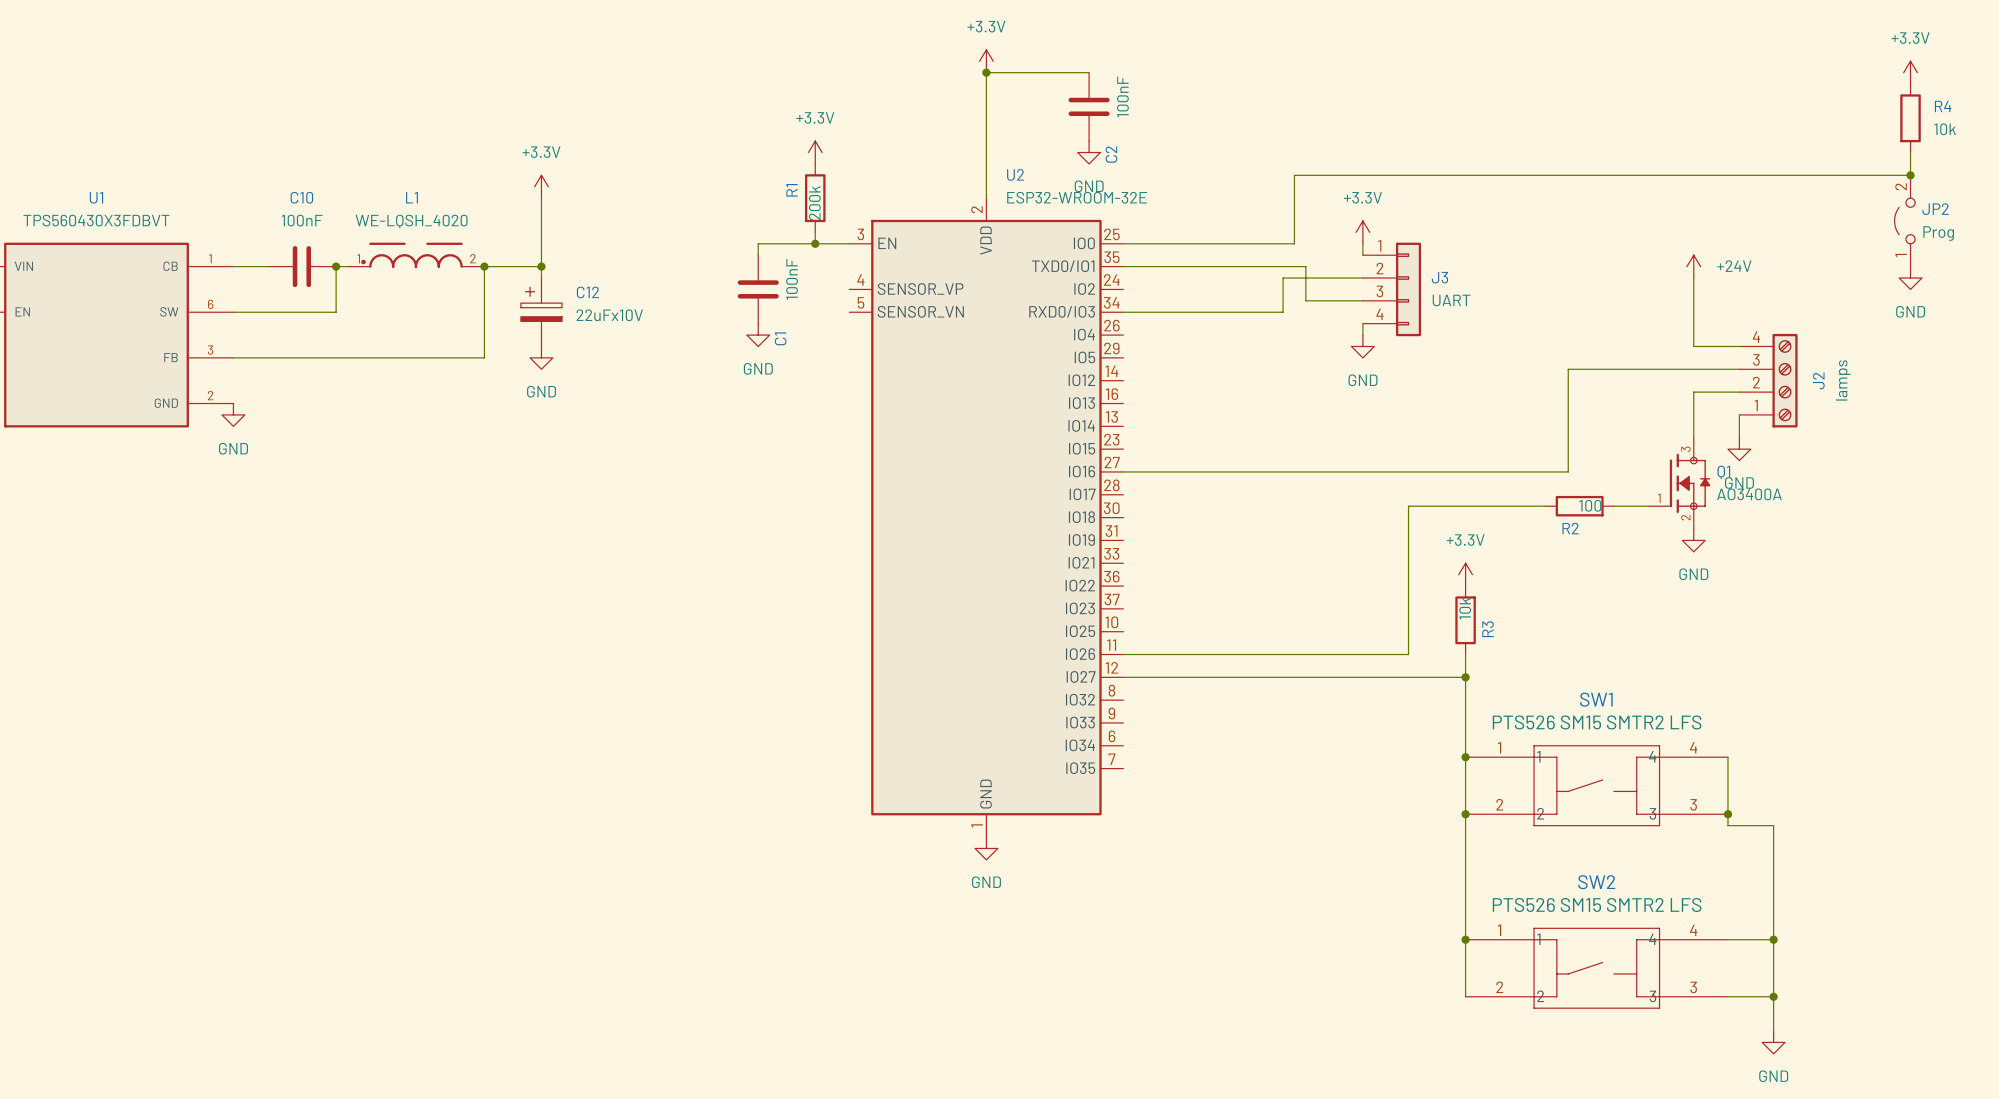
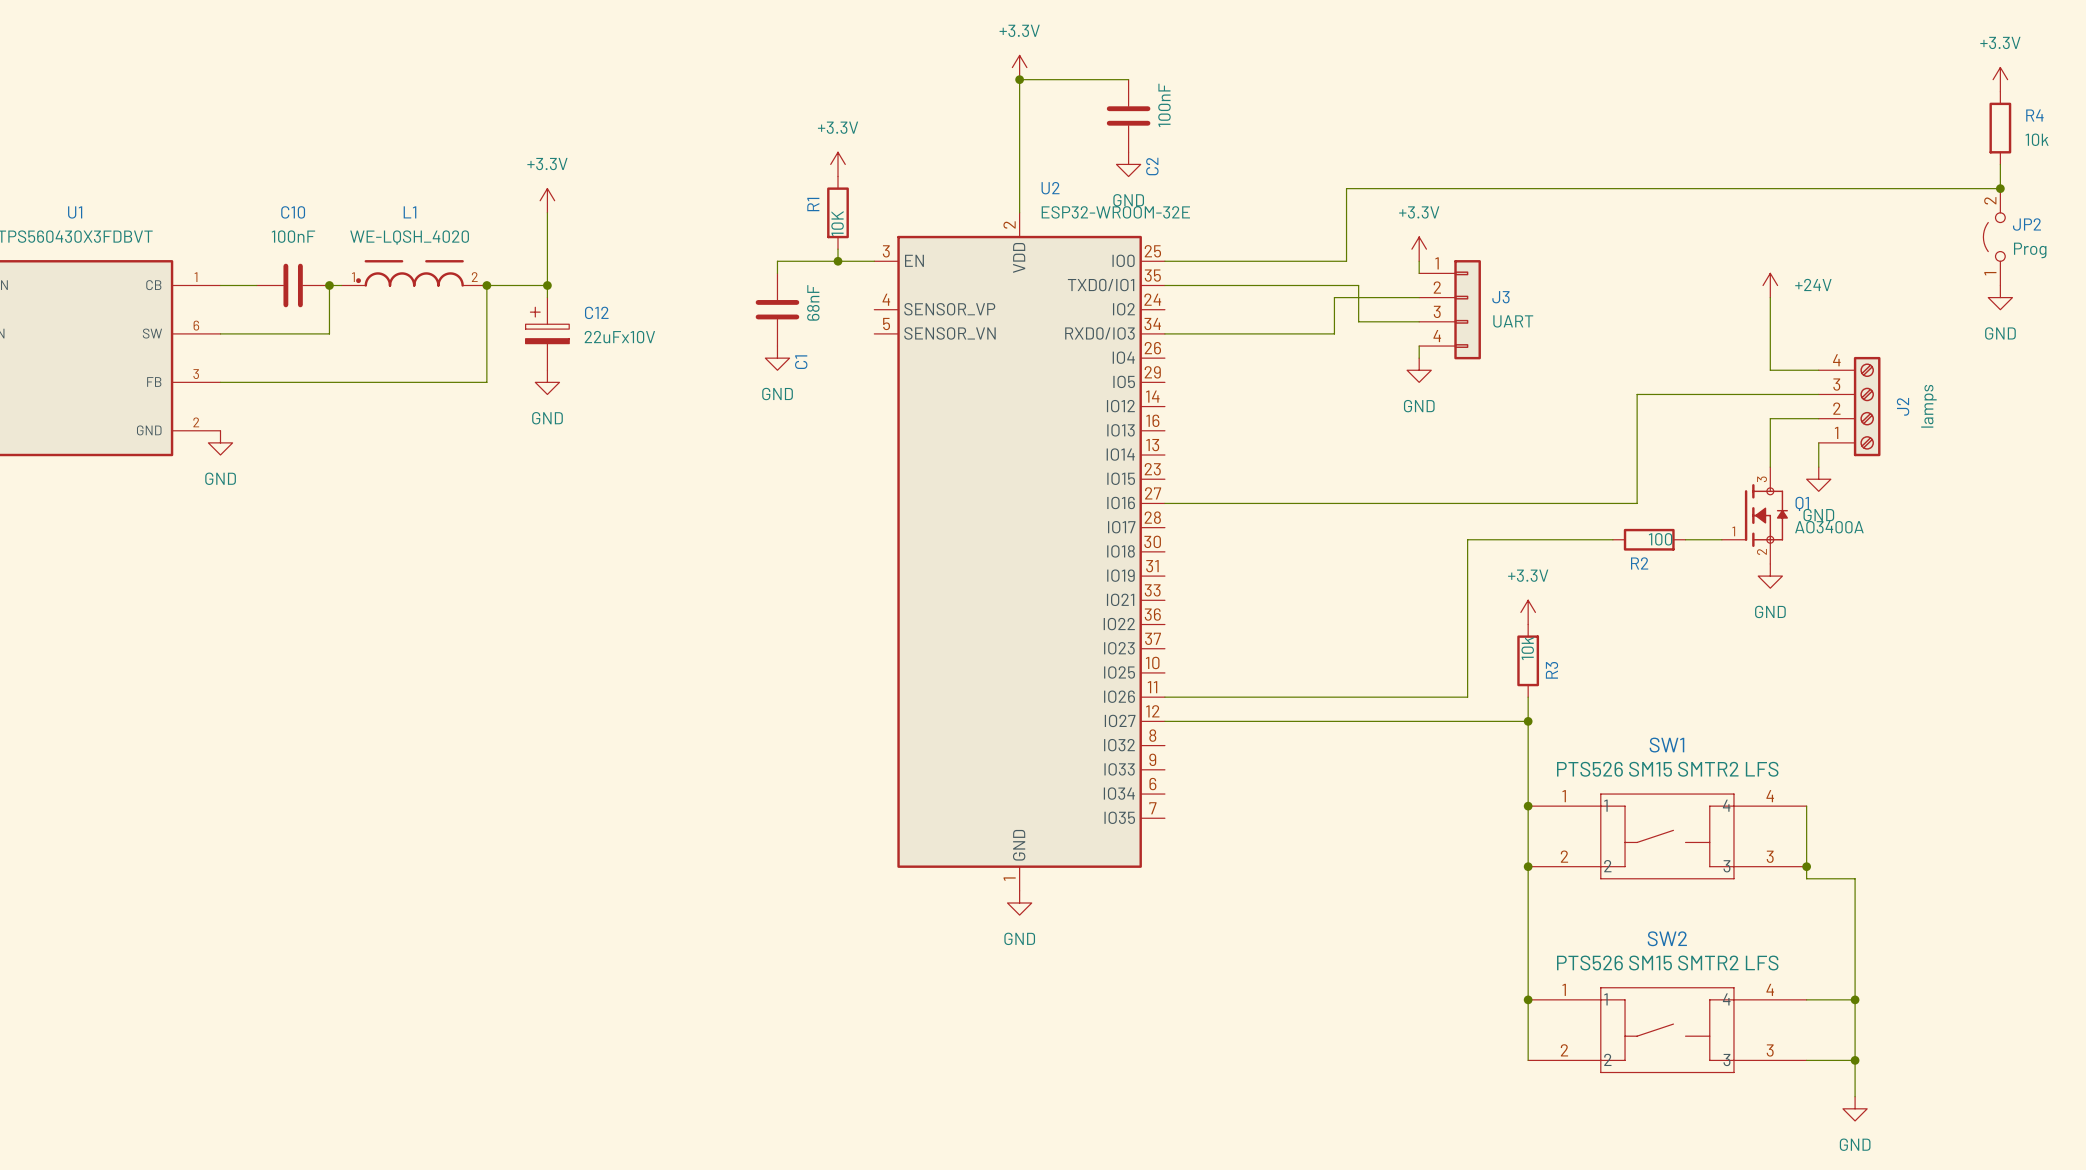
R1 value: 200k (814, 203) -> 10K (837, 223)
C1 value: 100nF (792, 279) -> 68nF (813, 302)

